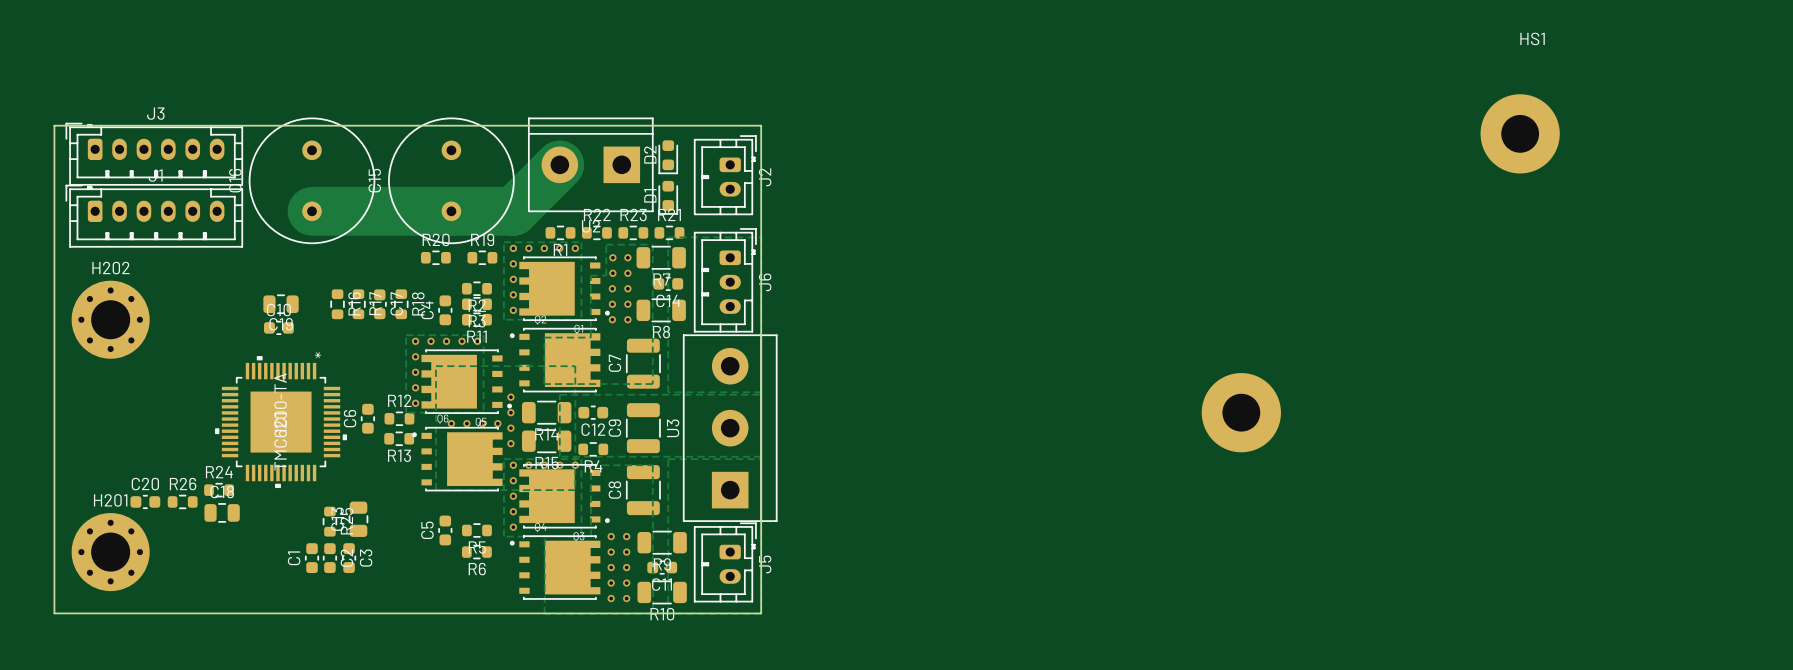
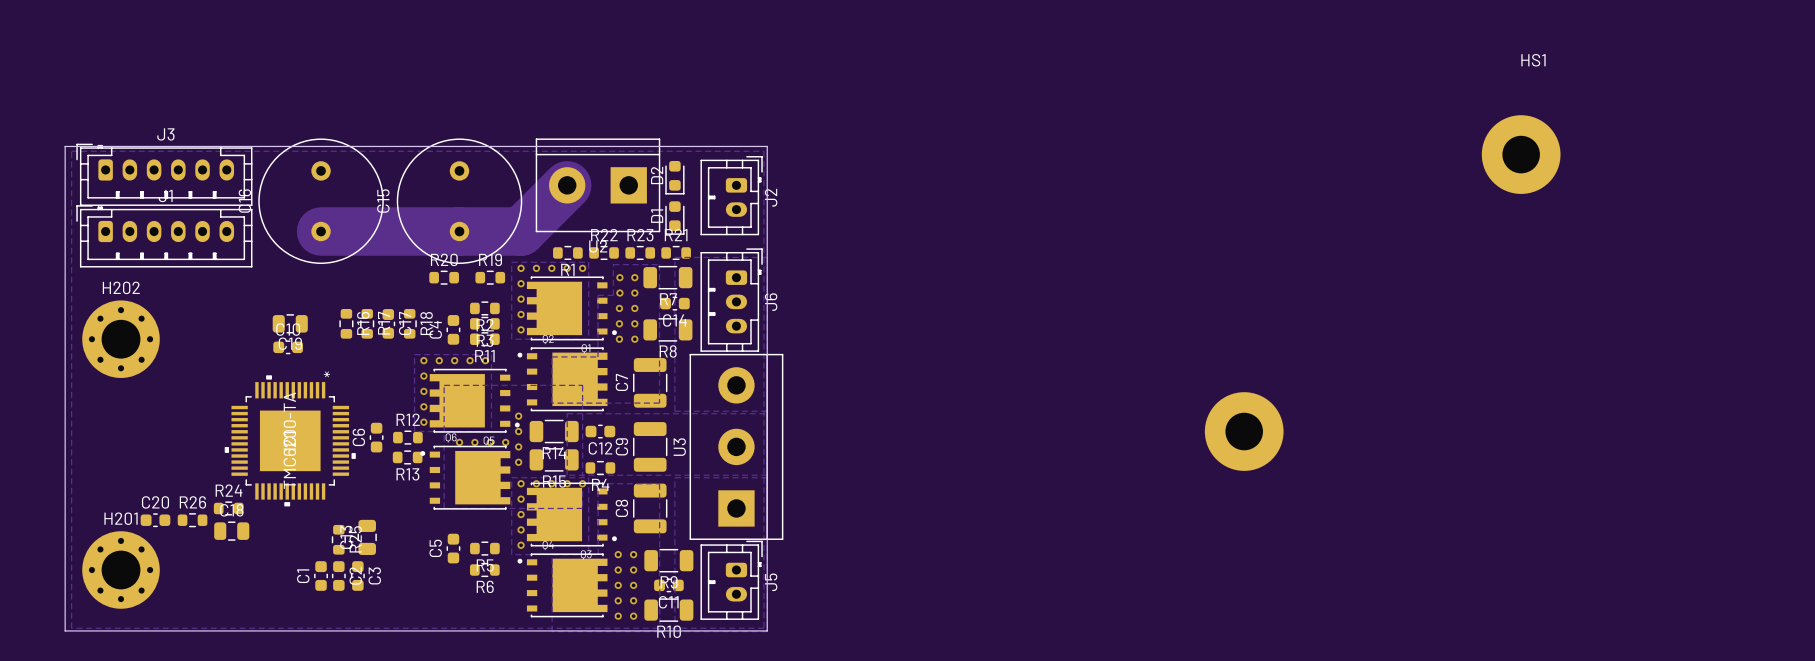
zone outline: none -> (71, 151) (71, 628) (763, 628) (763, 151) (71, 151)

